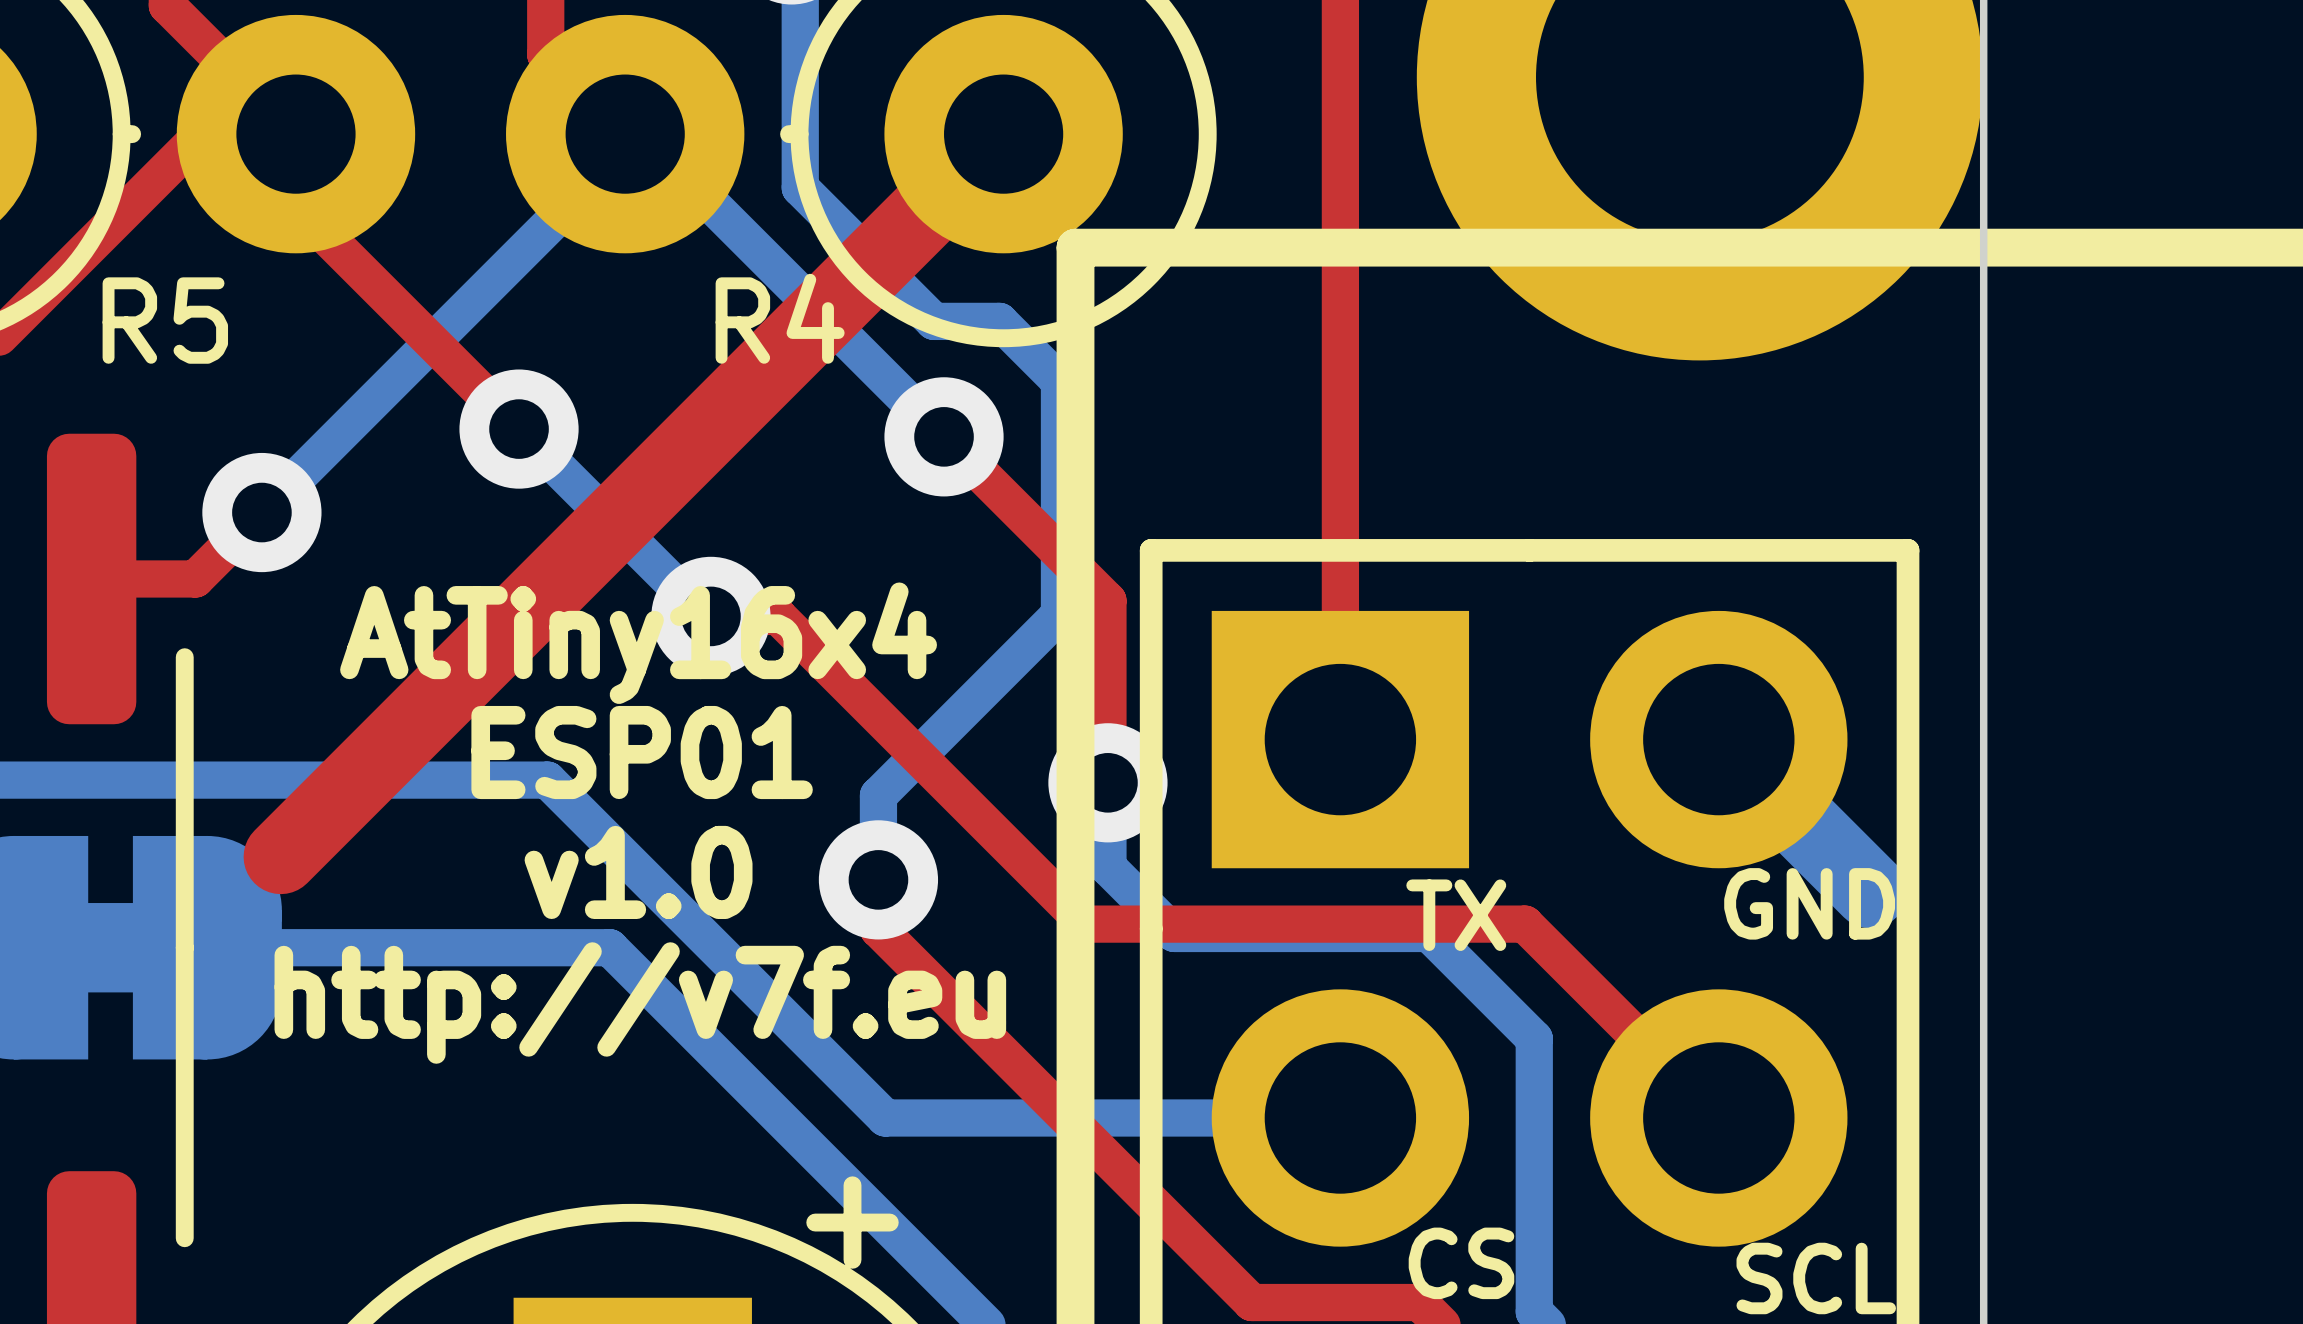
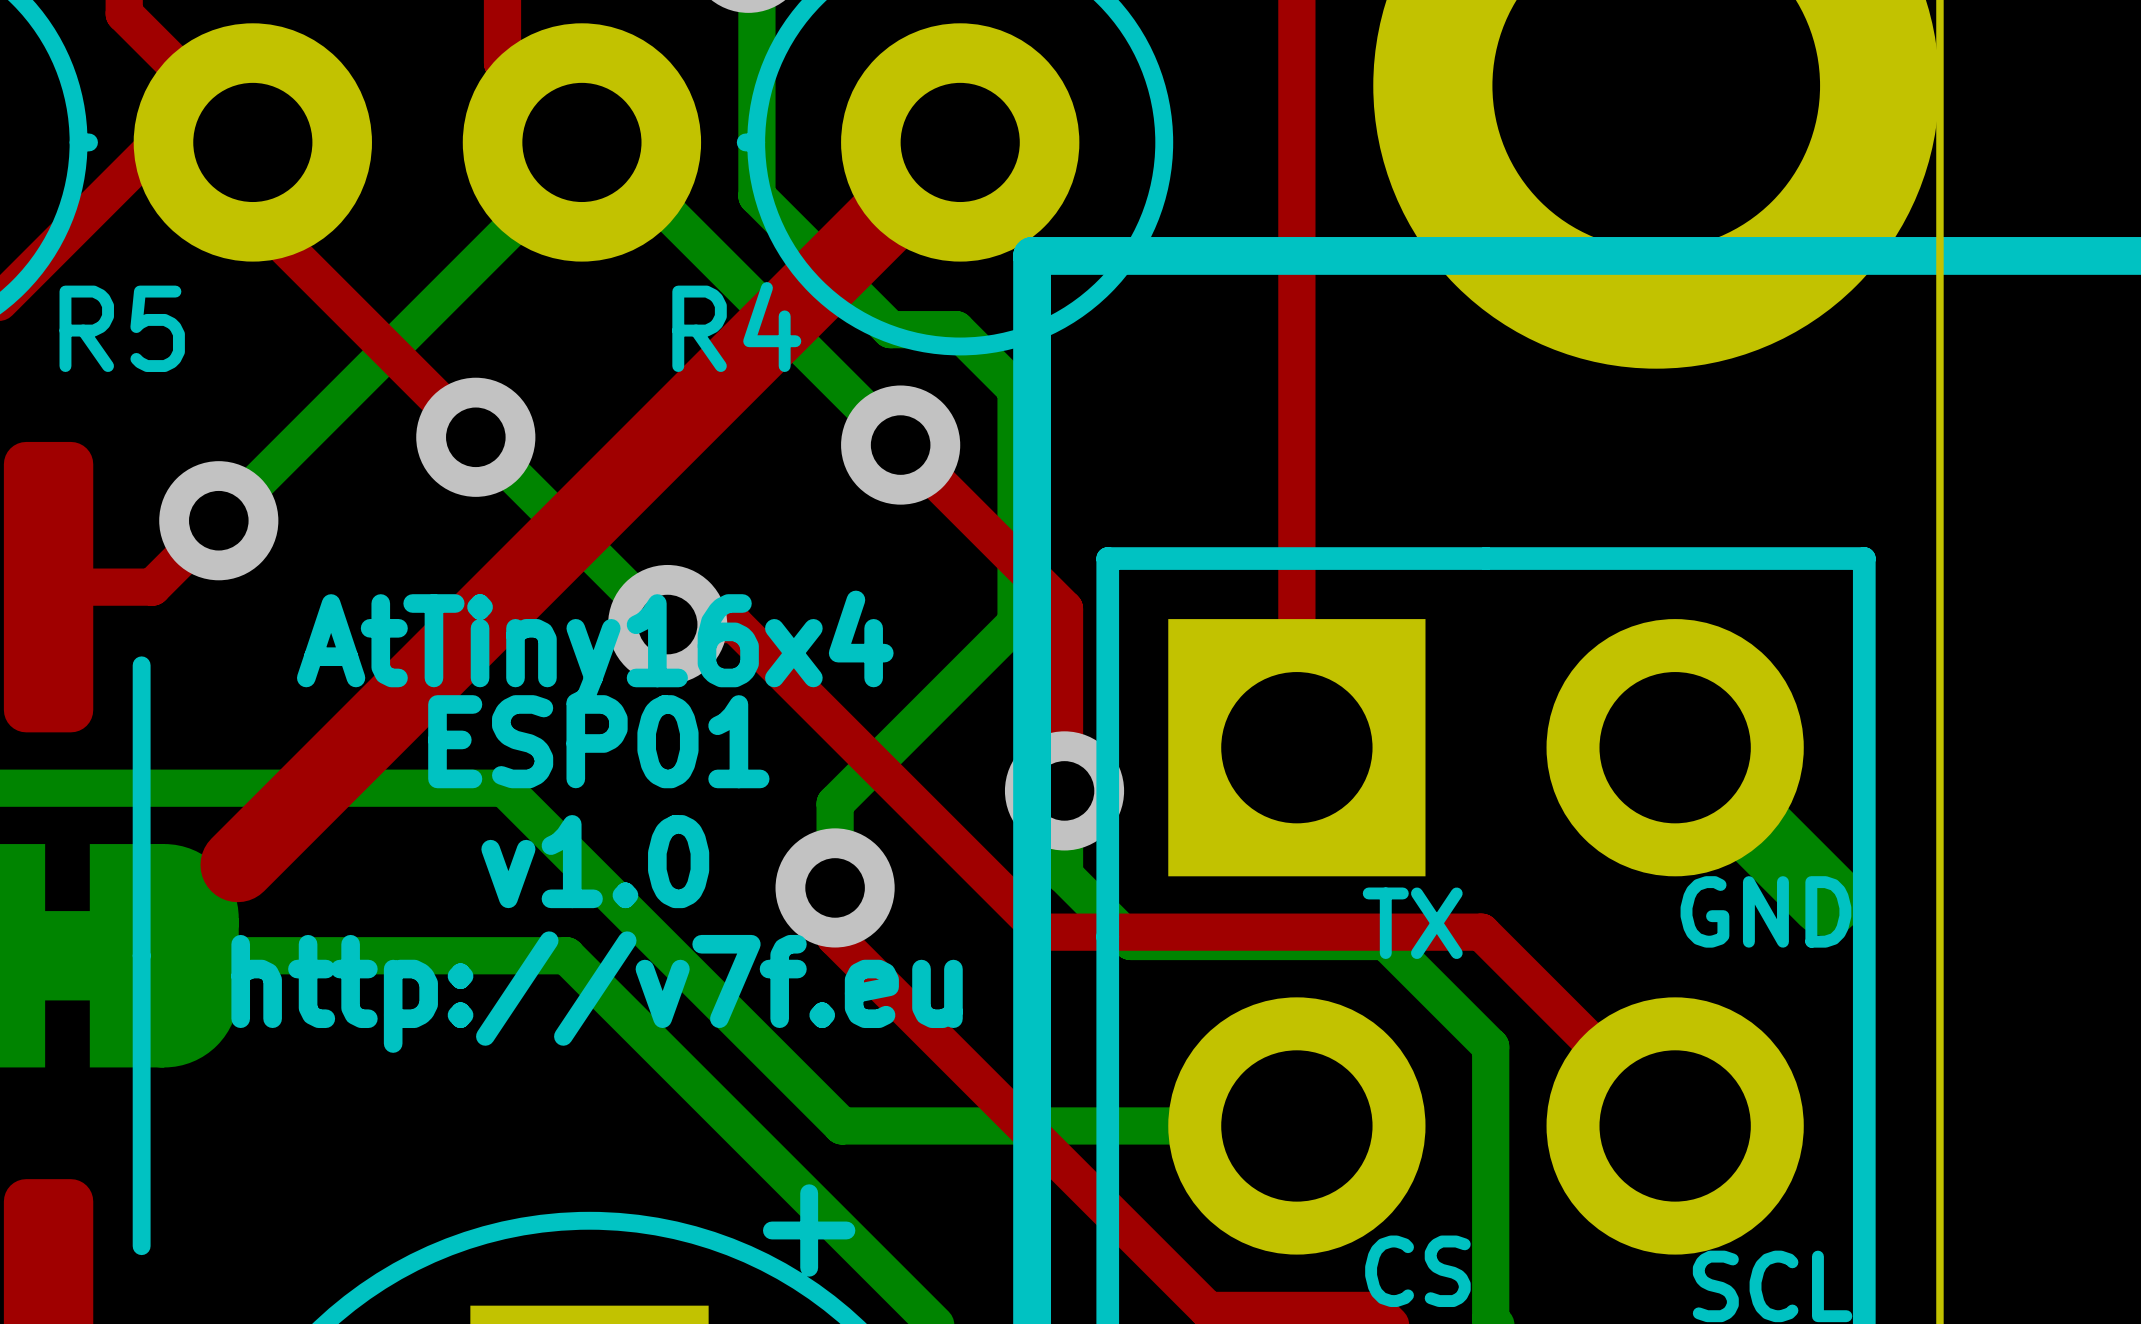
text position: ESP01 (642, 752) -> ESP01 (598, 741)
text position: v1.0 (638, 872) -> v1.0 (595, 861)
text position: http://v7f.eu (640, 1003) -> http://v7f.eu (597, 992)

